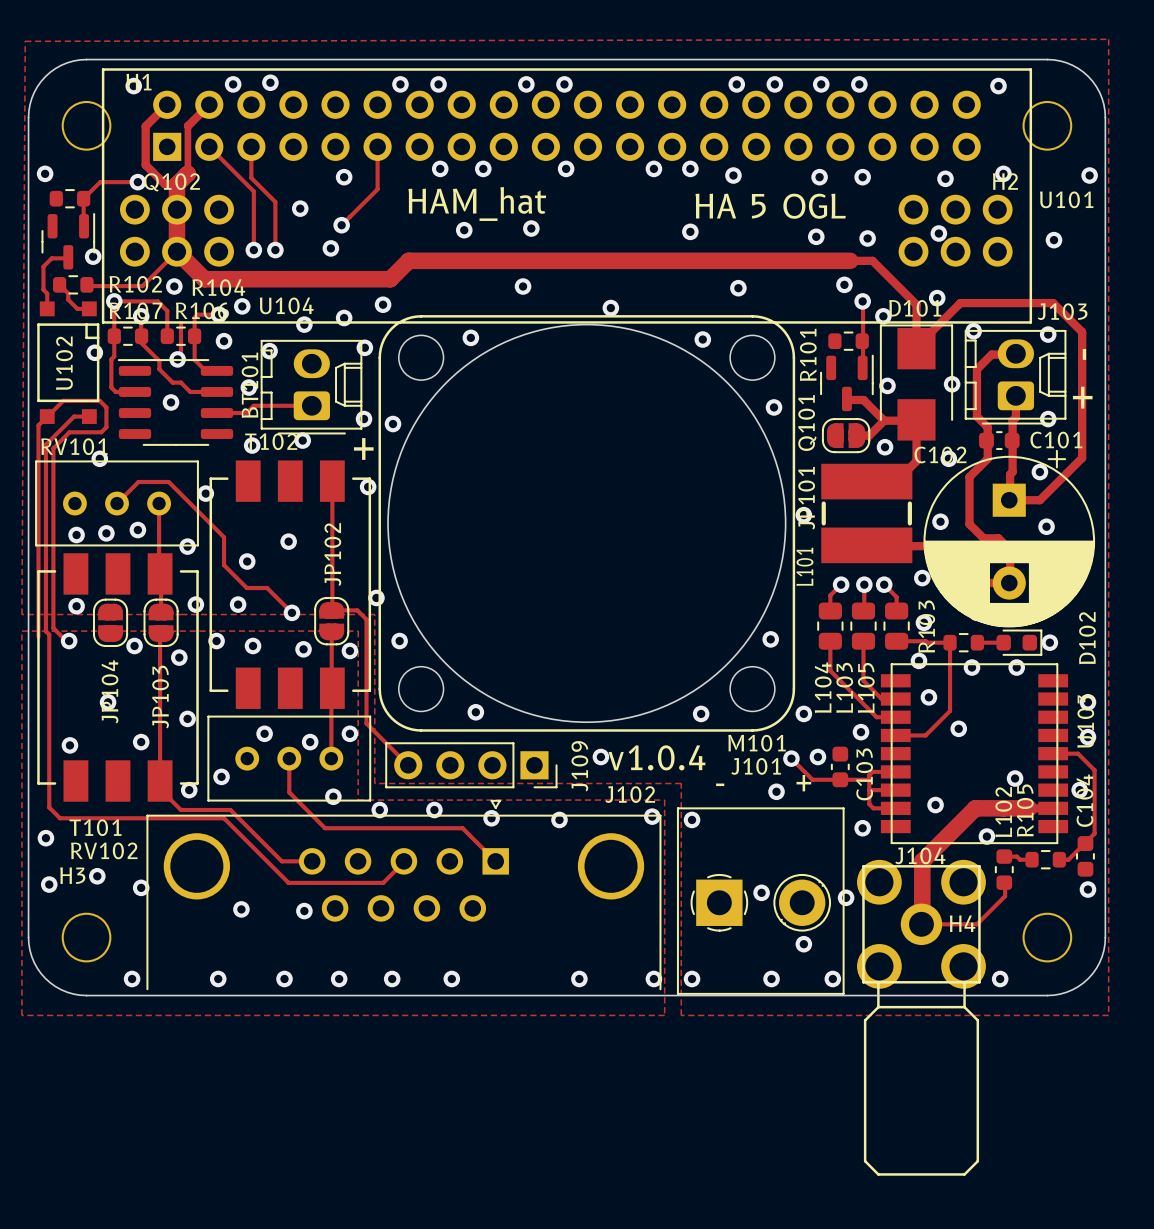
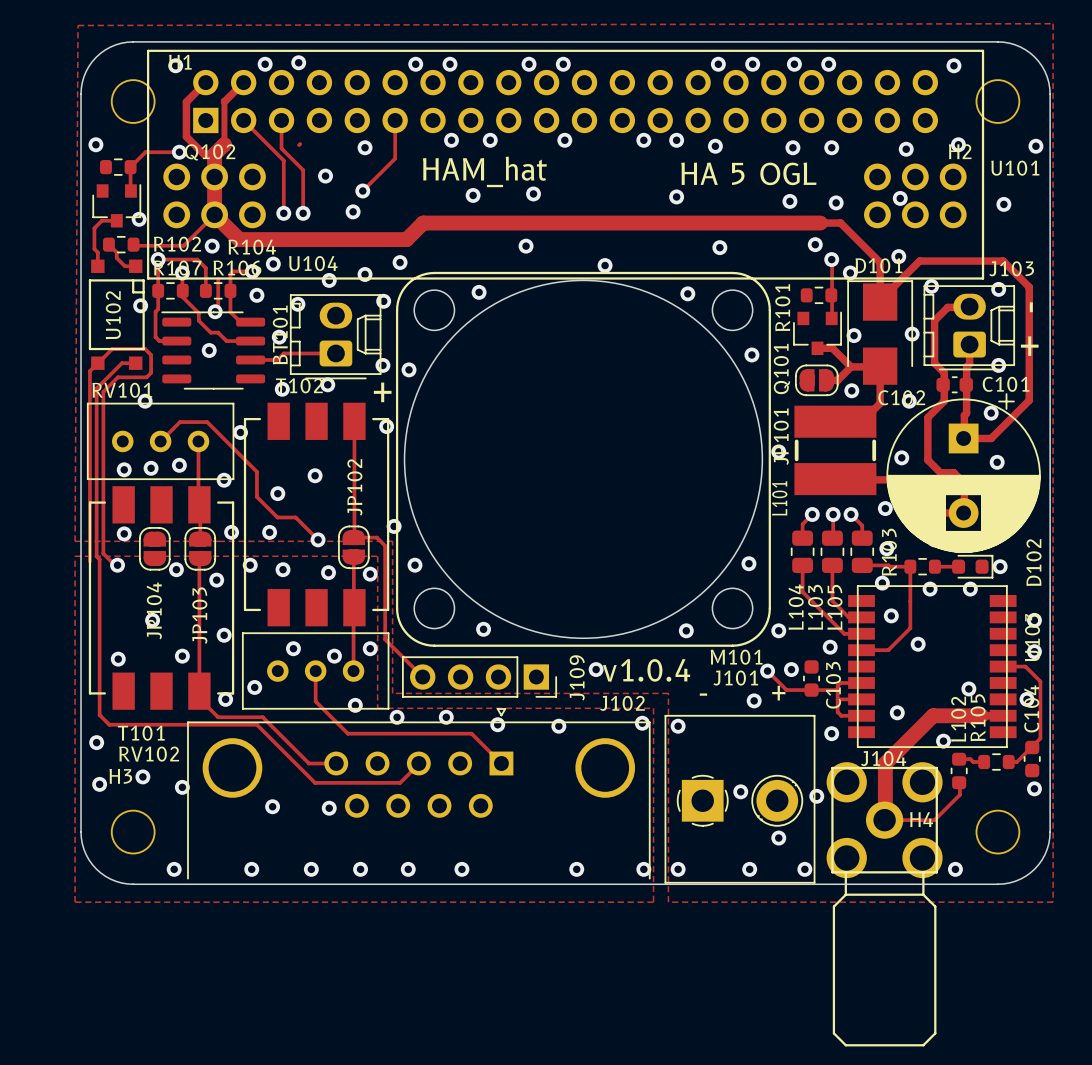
track: none -> (300, 144) (299, 145)
Q102 footprint: [41, 213, 96, 270] -> [92, 184, 142, 228]
Q101 footprint: [820, 354, 874, 412] -> [793, 311, 842, 355]

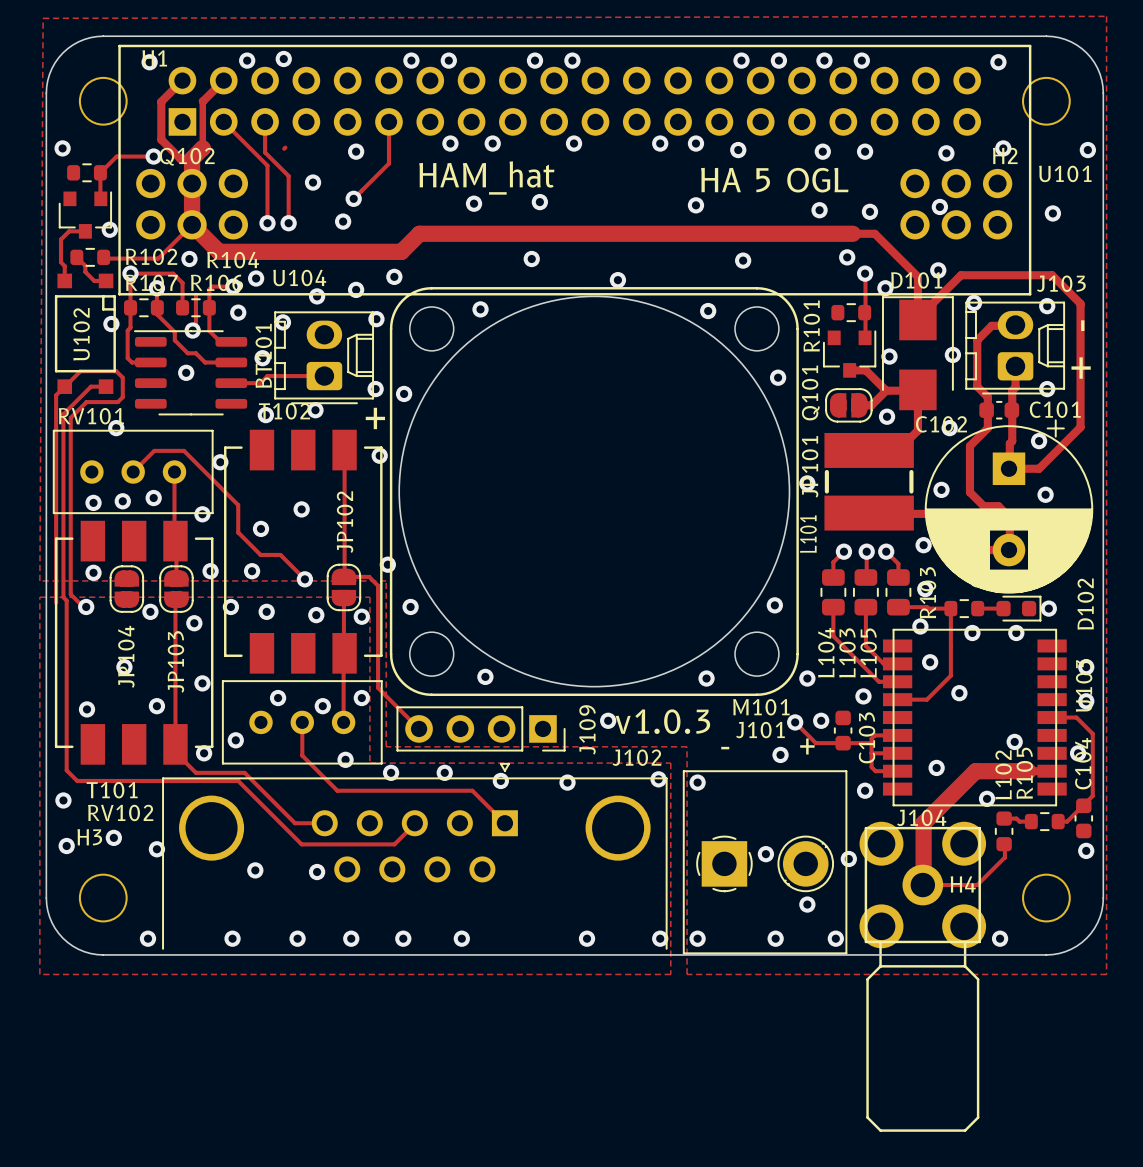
text: v1.0.4 (646, 670) -> v1.0.3 (662, 721)

